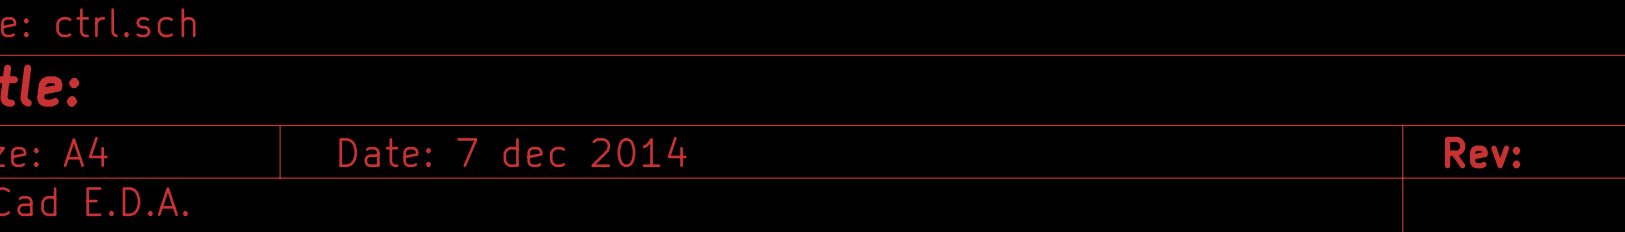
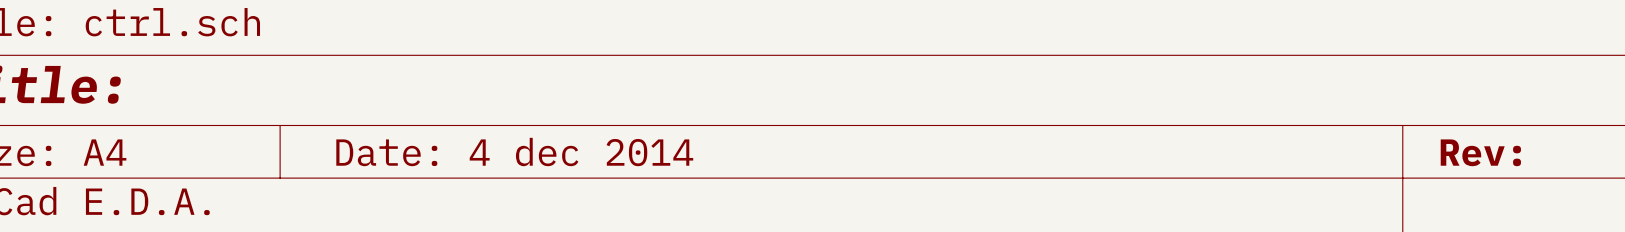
title block: Date: 7 dec 2014 (513, 151) -> Date: 4 dec 2014 (514, 152)

